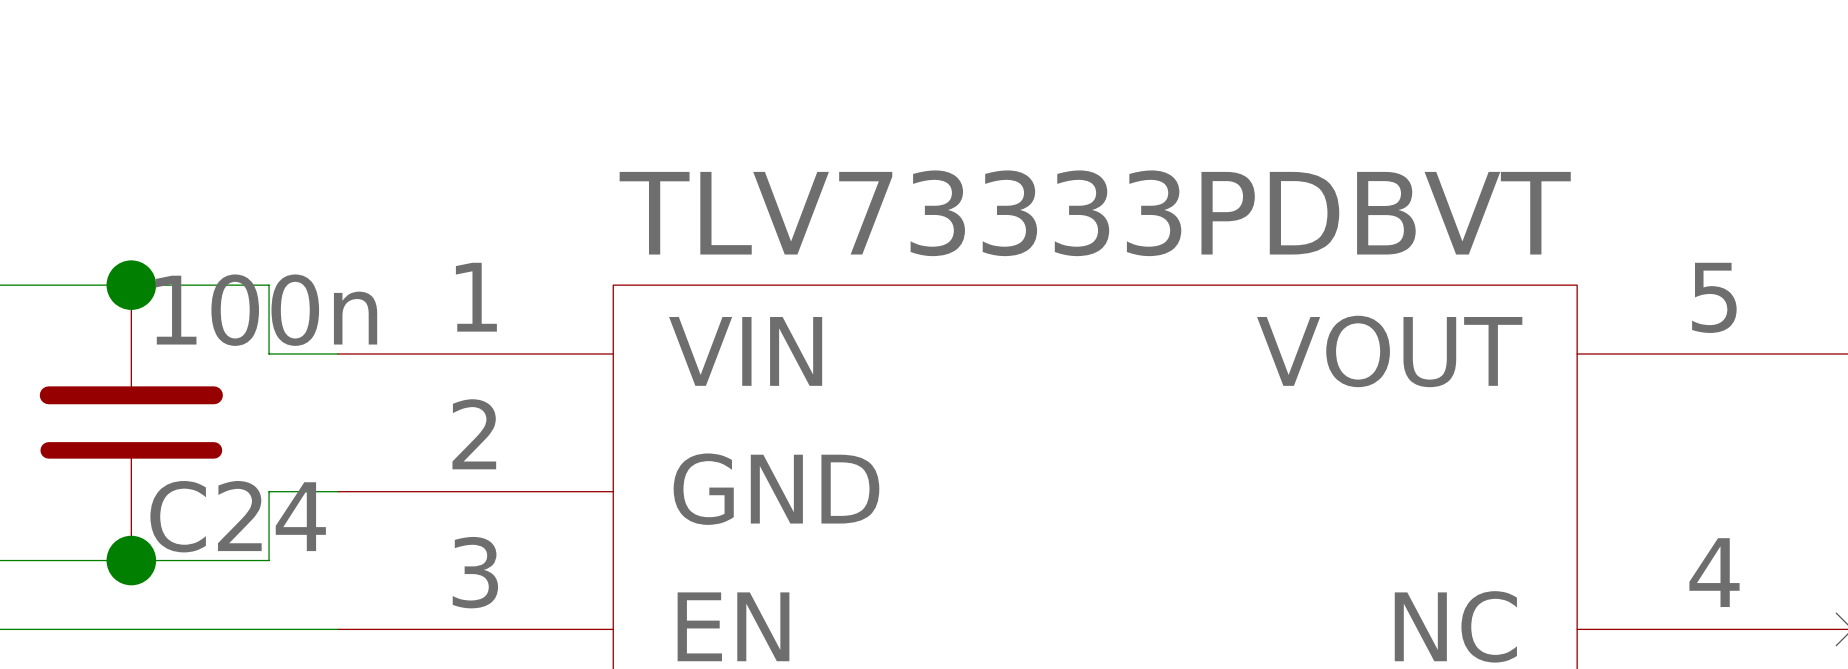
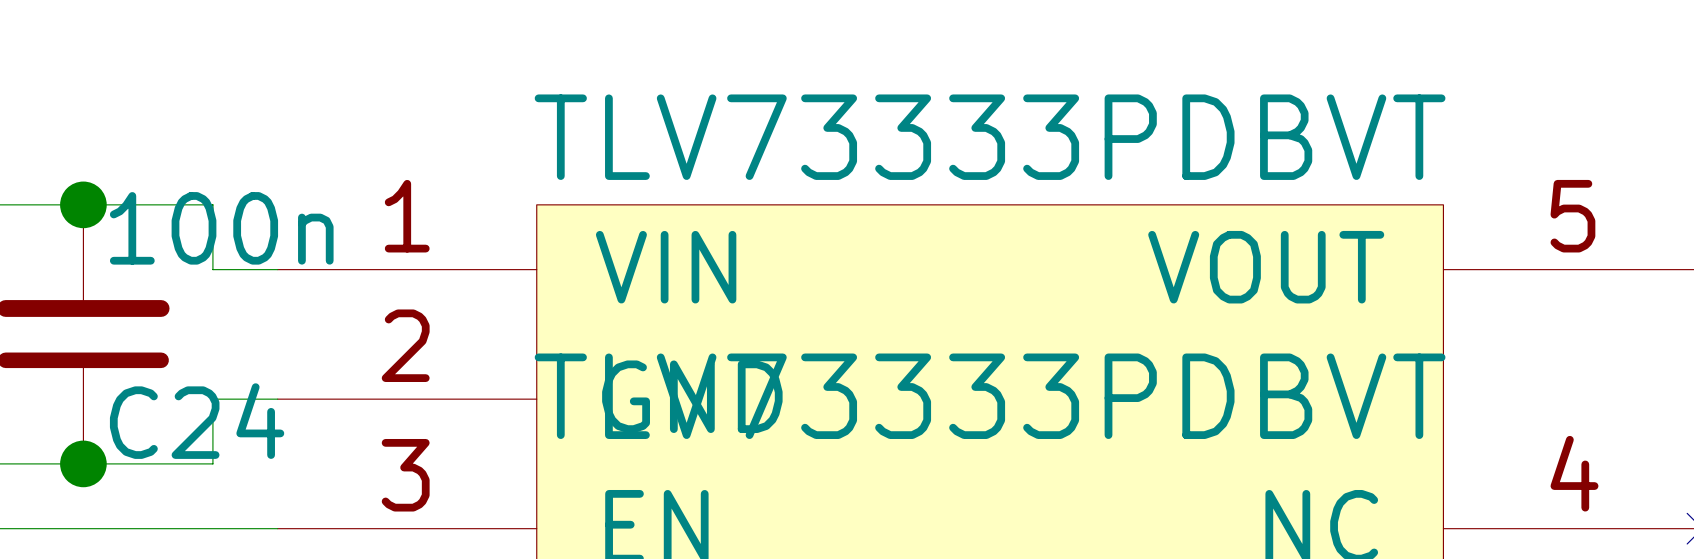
part text: none -> TLV73333PDBVT (990, 396)

